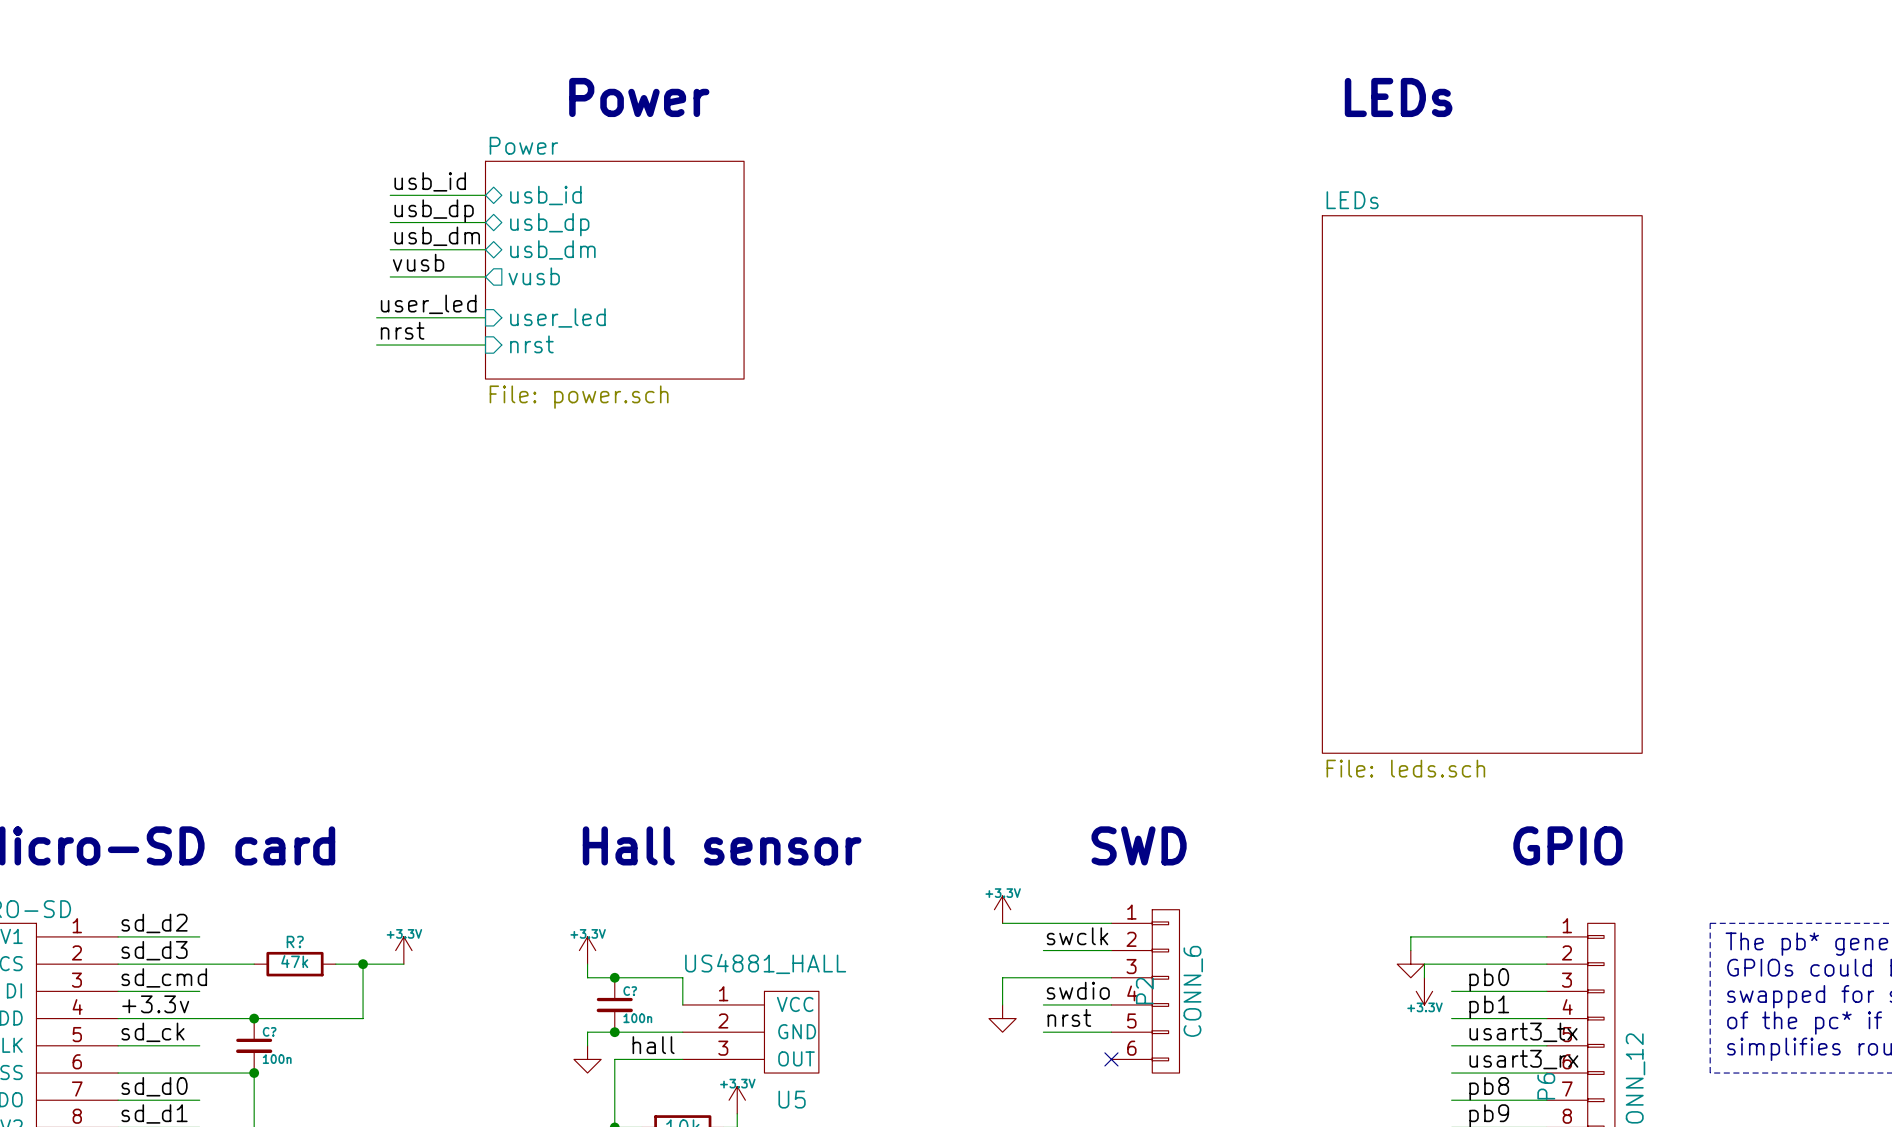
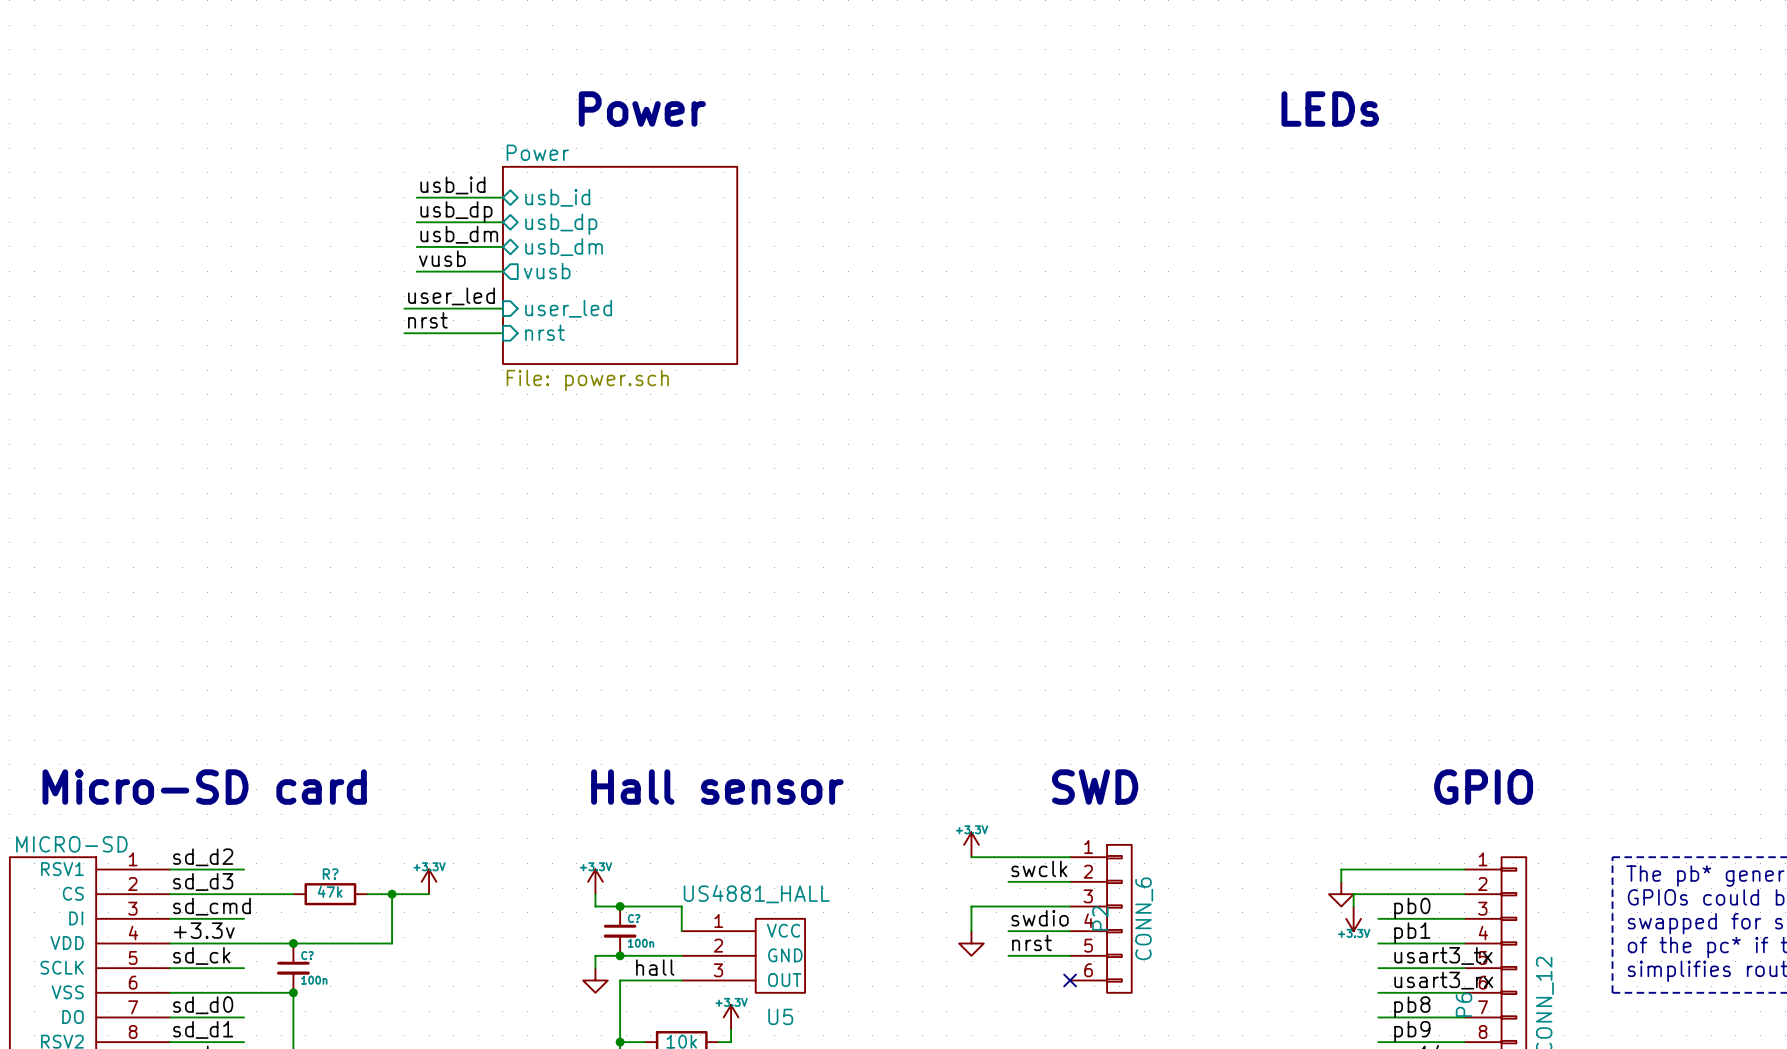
sheet LEDs: File: leds.sch (1482, 484) -> none

